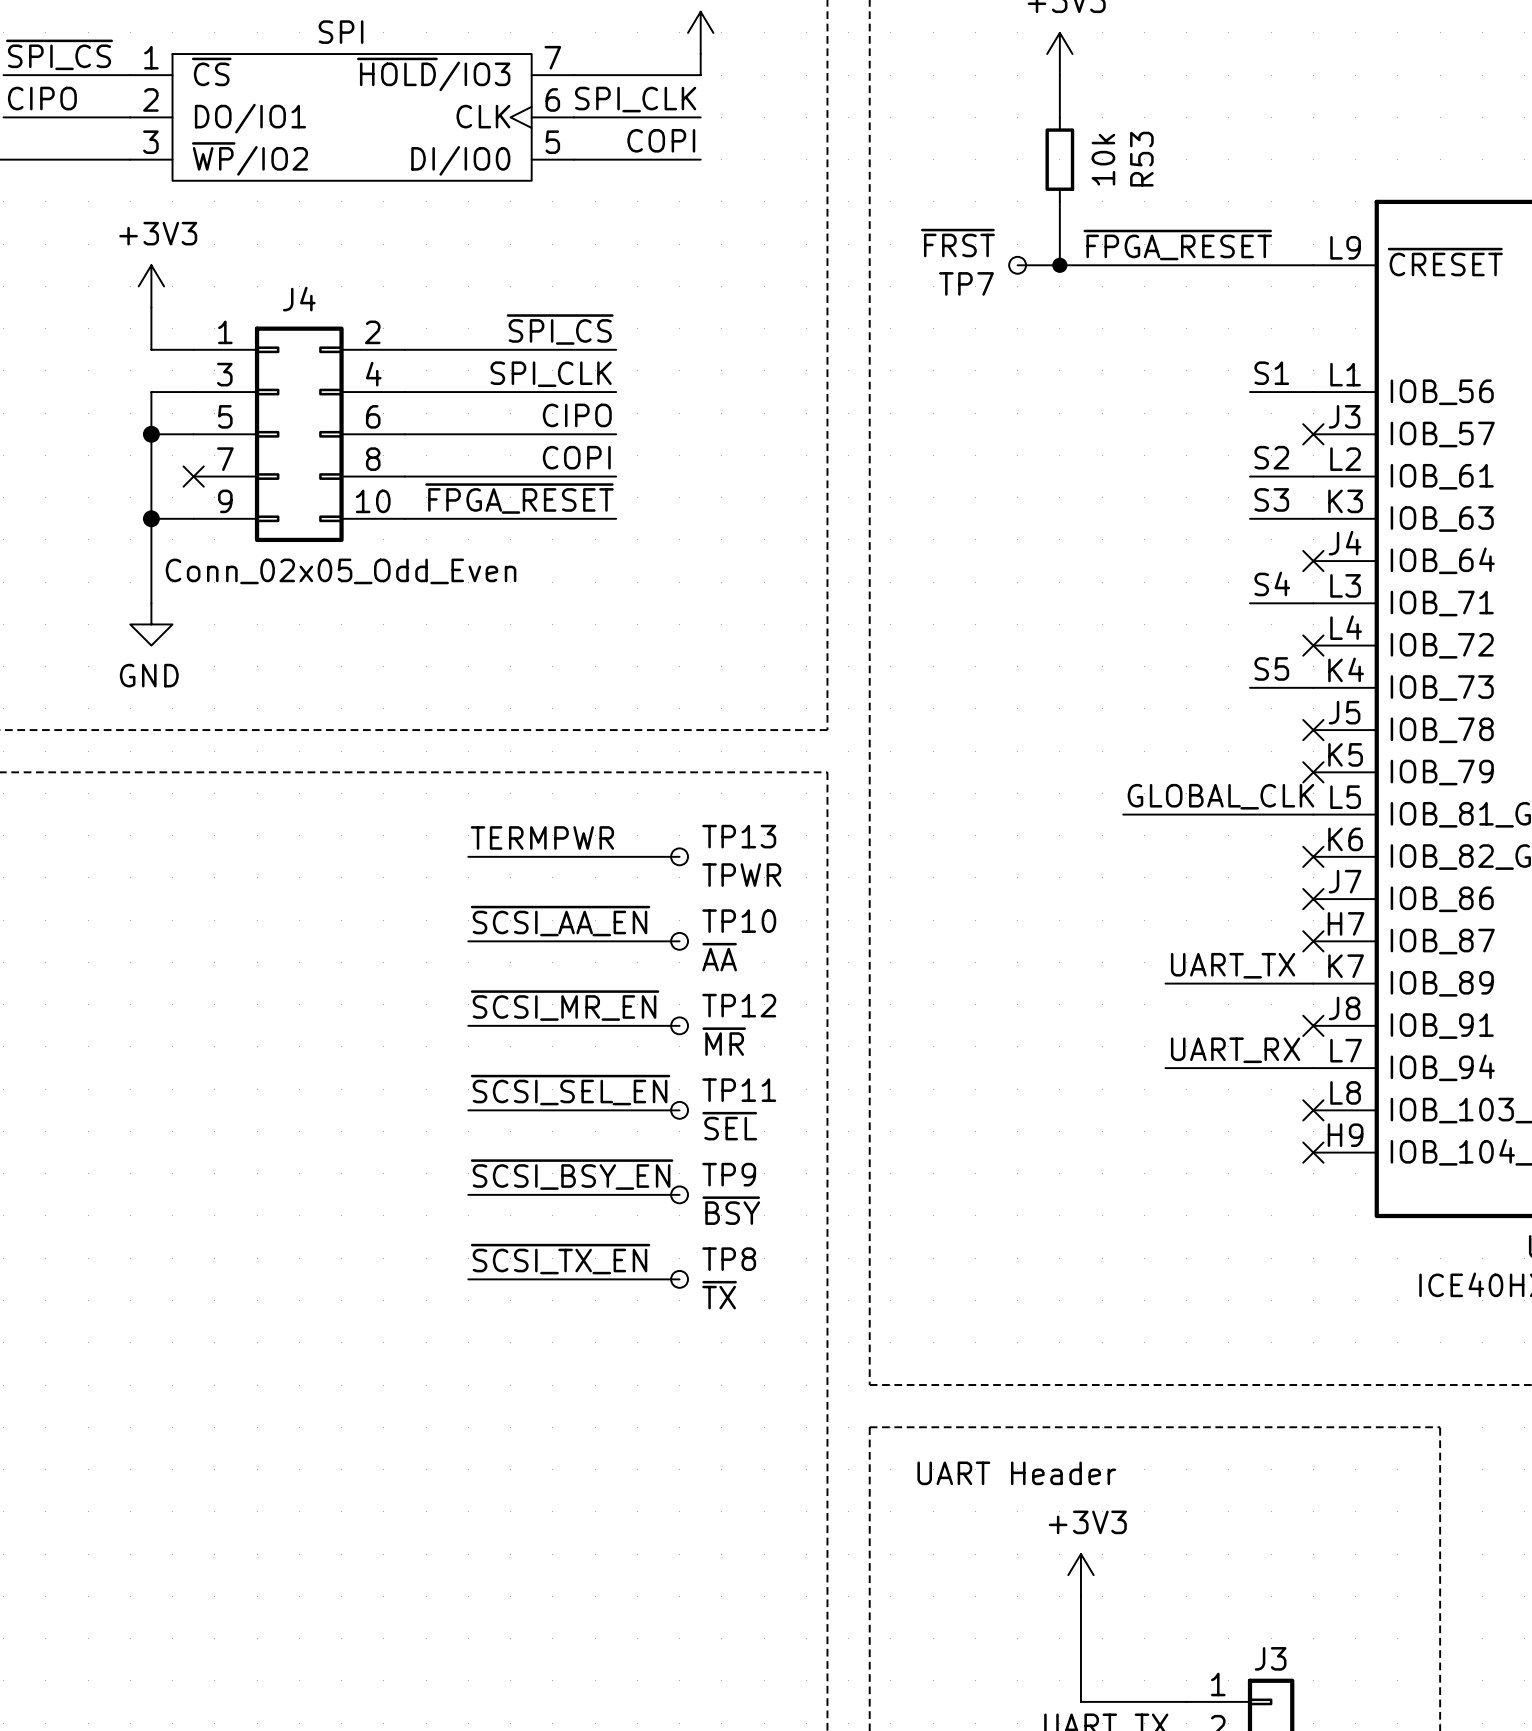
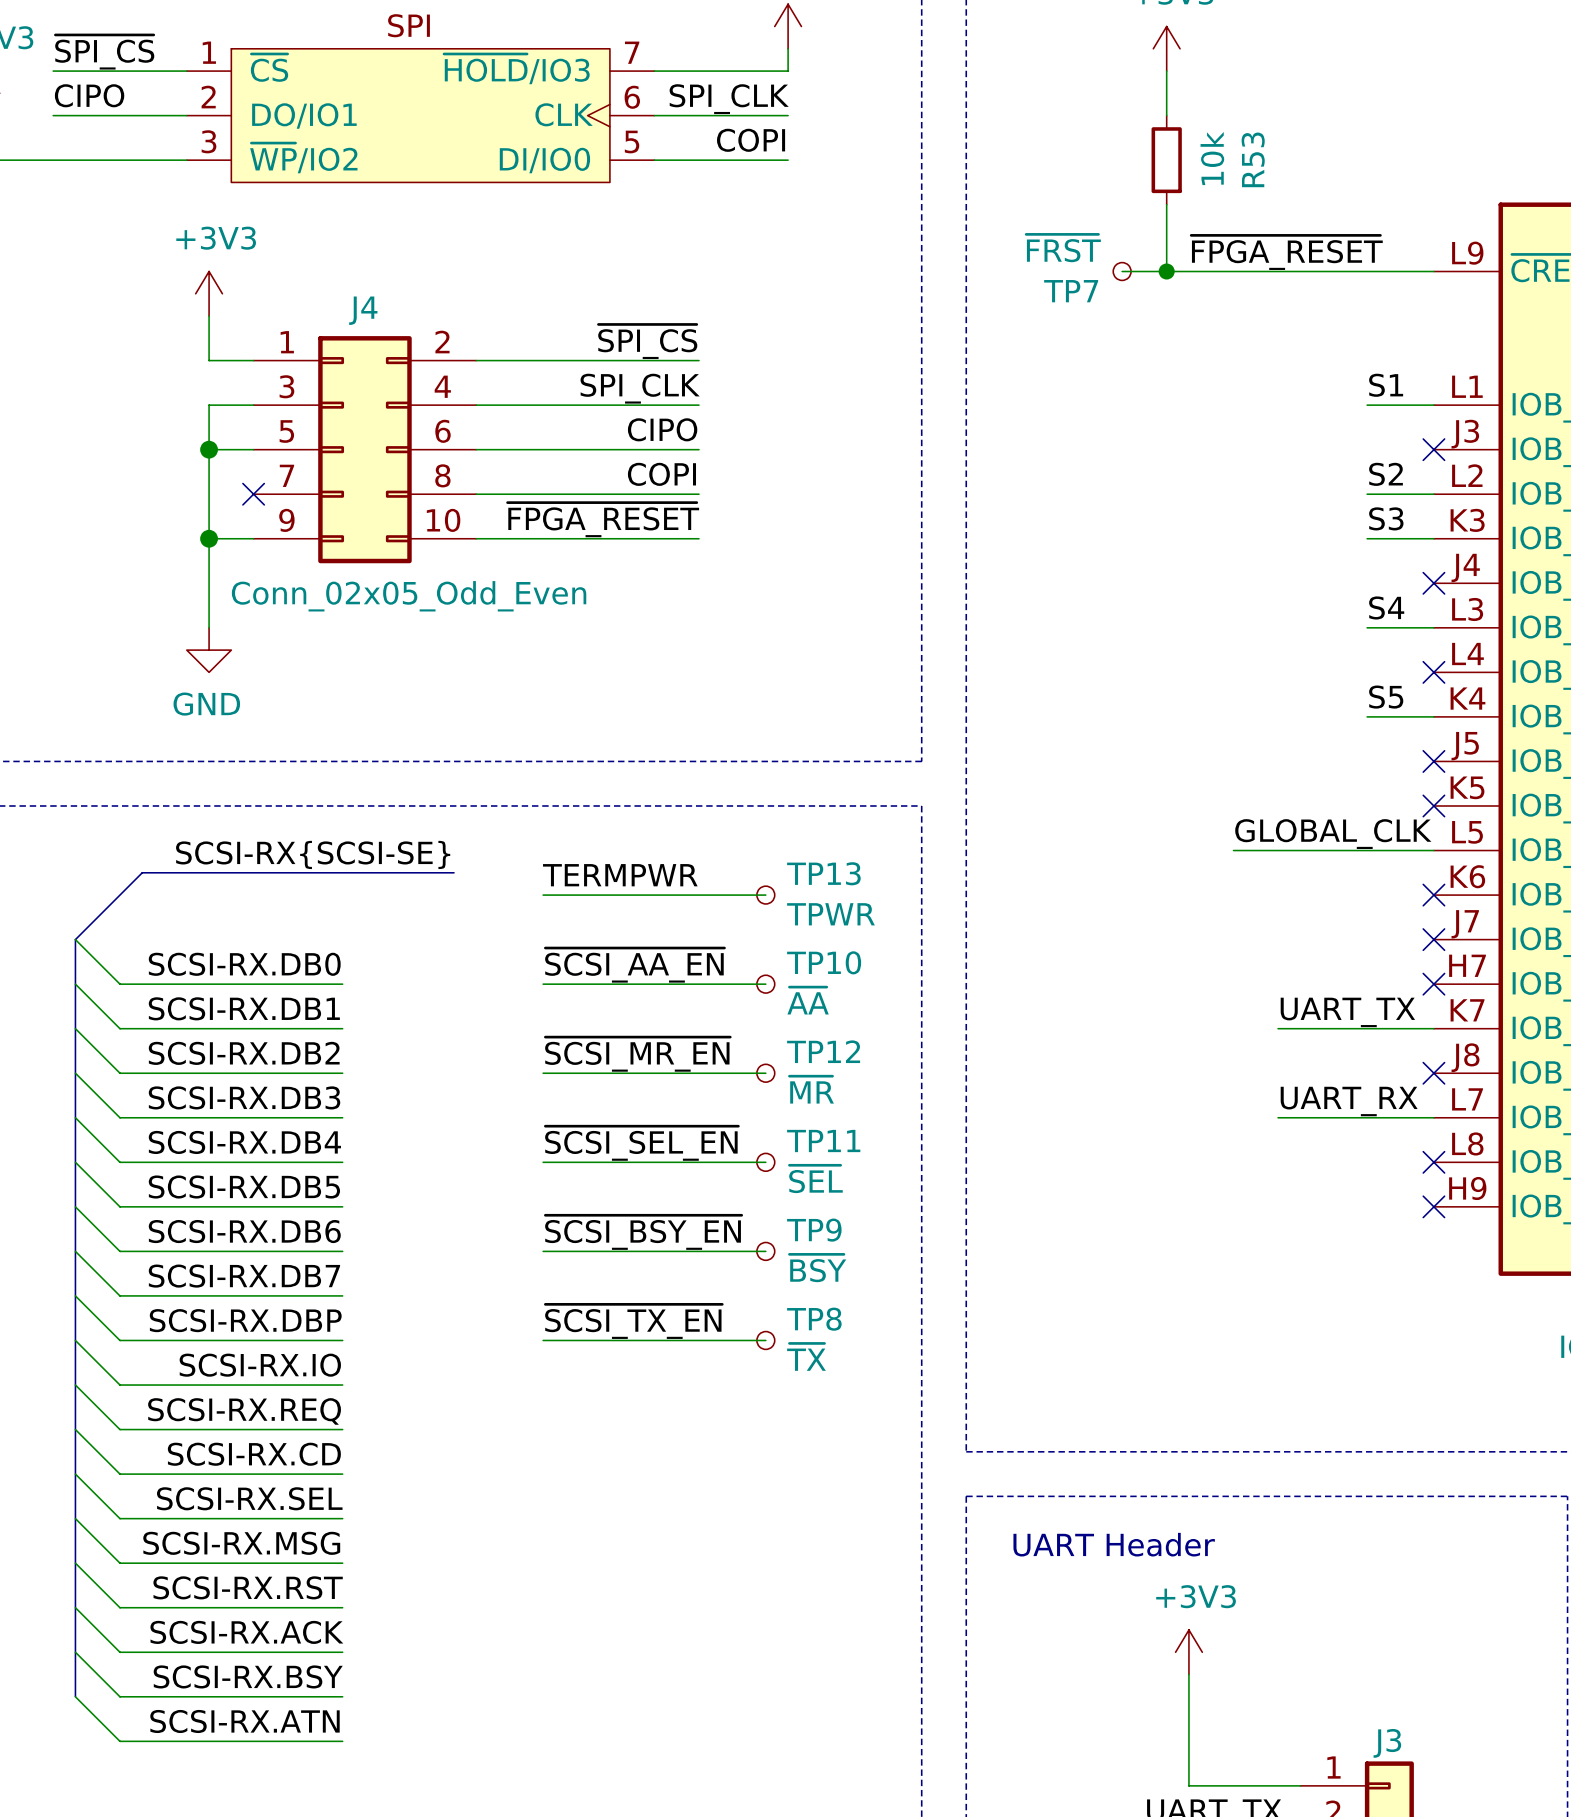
label: none -> SCSI-RX{SCSI-SE} (313, 854)
bus: none -> (454, 872) (142, 872) (75, 939) (75, 1696)
wire: none -> (75, 939) (119, 984) (342, 984)
label: none -> SCSI-RX.DB0 (244, 964)
wire: none -> (75, 984) (119, 1028) (342, 1028)
label: none -> SCSI-RX.DB1 (244, 1008)
wire: none -> (75, 1028) (119, 1073) (342, 1073)
label: none -> SCSI-RX.DB2 (244, 1053)
wire: none -> (75, 1073) (119, 1117) (342, 1117)
label: none -> SCSI-RX.DB3 (244, 1097)
wire: none -> (75, 1117) (119, 1162) (342, 1162)
label: none -> SCSI-RX.DB4 (244, 1142)
wire: none -> (75, 1162) (119, 1206) (342, 1206)
label: none -> SCSI-RX.DB5 (244, 1187)
wire: none -> (75, 1206) (119, 1251) (342, 1251)
label: none -> SCSI-RX.DB6 (244, 1231)
wire: none -> (75, 1251) (119, 1295) (342, 1295)
label: none -> SCSI-RX.DB7 (244, 1276)
wire: none -> (75, 1295) (119, 1340) (342, 1340)
label: none -> SCSI-RX.DBP (245, 1320)
wire: none -> (75, 1340) (119, 1385) (342, 1385)
label: none -> SCSI-RX.IO (260, 1365)
wire: none -> (75, 1385) (119, 1429) (342, 1429)
label: none -> SCSI-RX.REQ (244, 1411)
wire: none -> (75, 1429) (119, 1474) (342, 1474)
label: none -> SCSI-RX.CD (254, 1454)
wire: none -> (75, 1474) (119, 1518) (342, 1518)
label: none -> SCSI-RX.SEL (249, 1498)
wire: none -> (75, 1518) (119, 1563) (342, 1563)
label: none -> SCSI-RX.MSG (241, 1543)
wire: none -> (75, 1563) (119, 1607) (342, 1607)
label: none -> SCSI-RX.RST (248, 1587)
wire: none -> (75, 1607) (119, 1652) (342, 1652)
label: none -> SCSI-RX.ACK (246, 1632)
wire: none -> (75, 1652) (119, 1696) (342, 1696)
label: none -> SCSI-RX.BSY (248, 1676)
wire: none -> (75, 1696) (119, 1741) (342, 1741)
label: none -> SCSI-RX.ATN (244, 1721)

